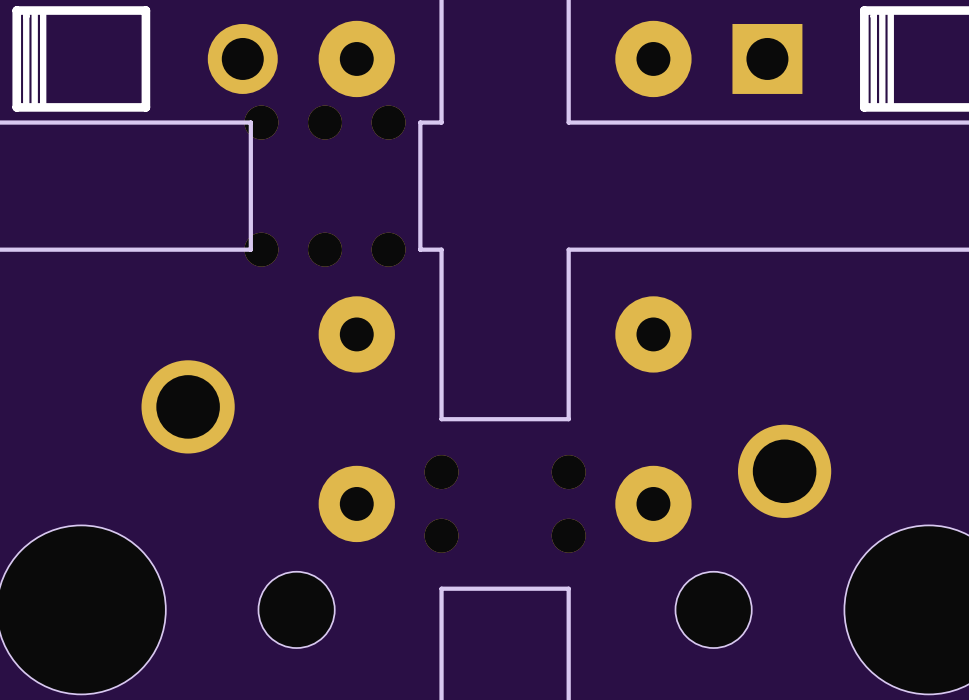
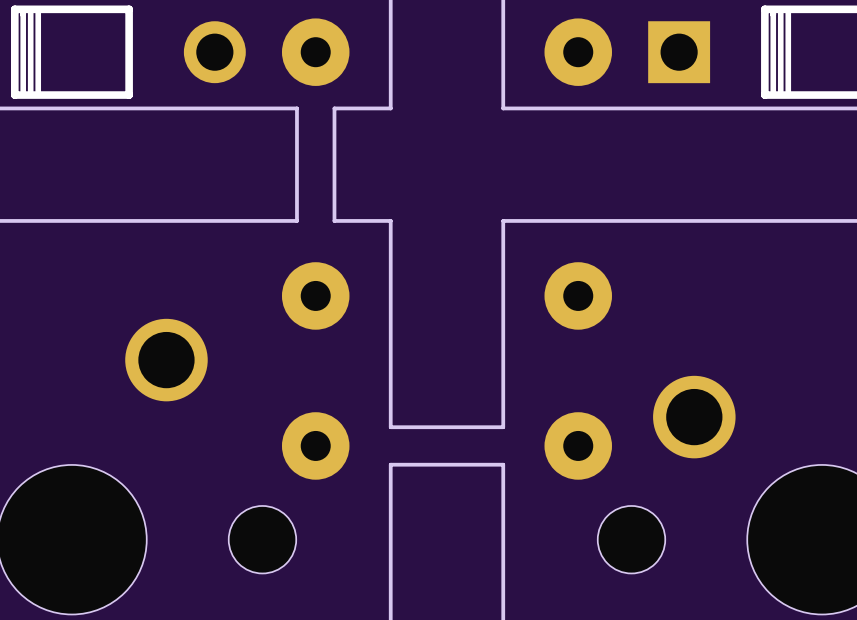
board edge: (250, 122) (250, 249) -> (221, 108) (296, 108) (296, 220) (221, 220)
part: (325, 122) -> none
board edge: (420, 122) (420, 249) -> (371, 108) (334, 108) (334, 220) (371, 220)
part: (325, 249) -> none
board edge: (568, 419) (441, 419) -> (503, 370) (503, 427) (390, 427) (390, 370)
part: (441, 503) -> none
part: (568, 503) -> none
board edge: (568, 588) (441, 588) -> (503, 520) (503, 464) (390, 464) (390, 520)

